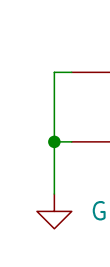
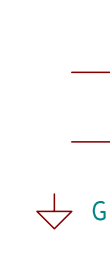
wire: (71, 72) (54, 72) (54, 194) -> none
wire: (54, 141) (71, 141) -> none
junction: (54, 141) -> none

